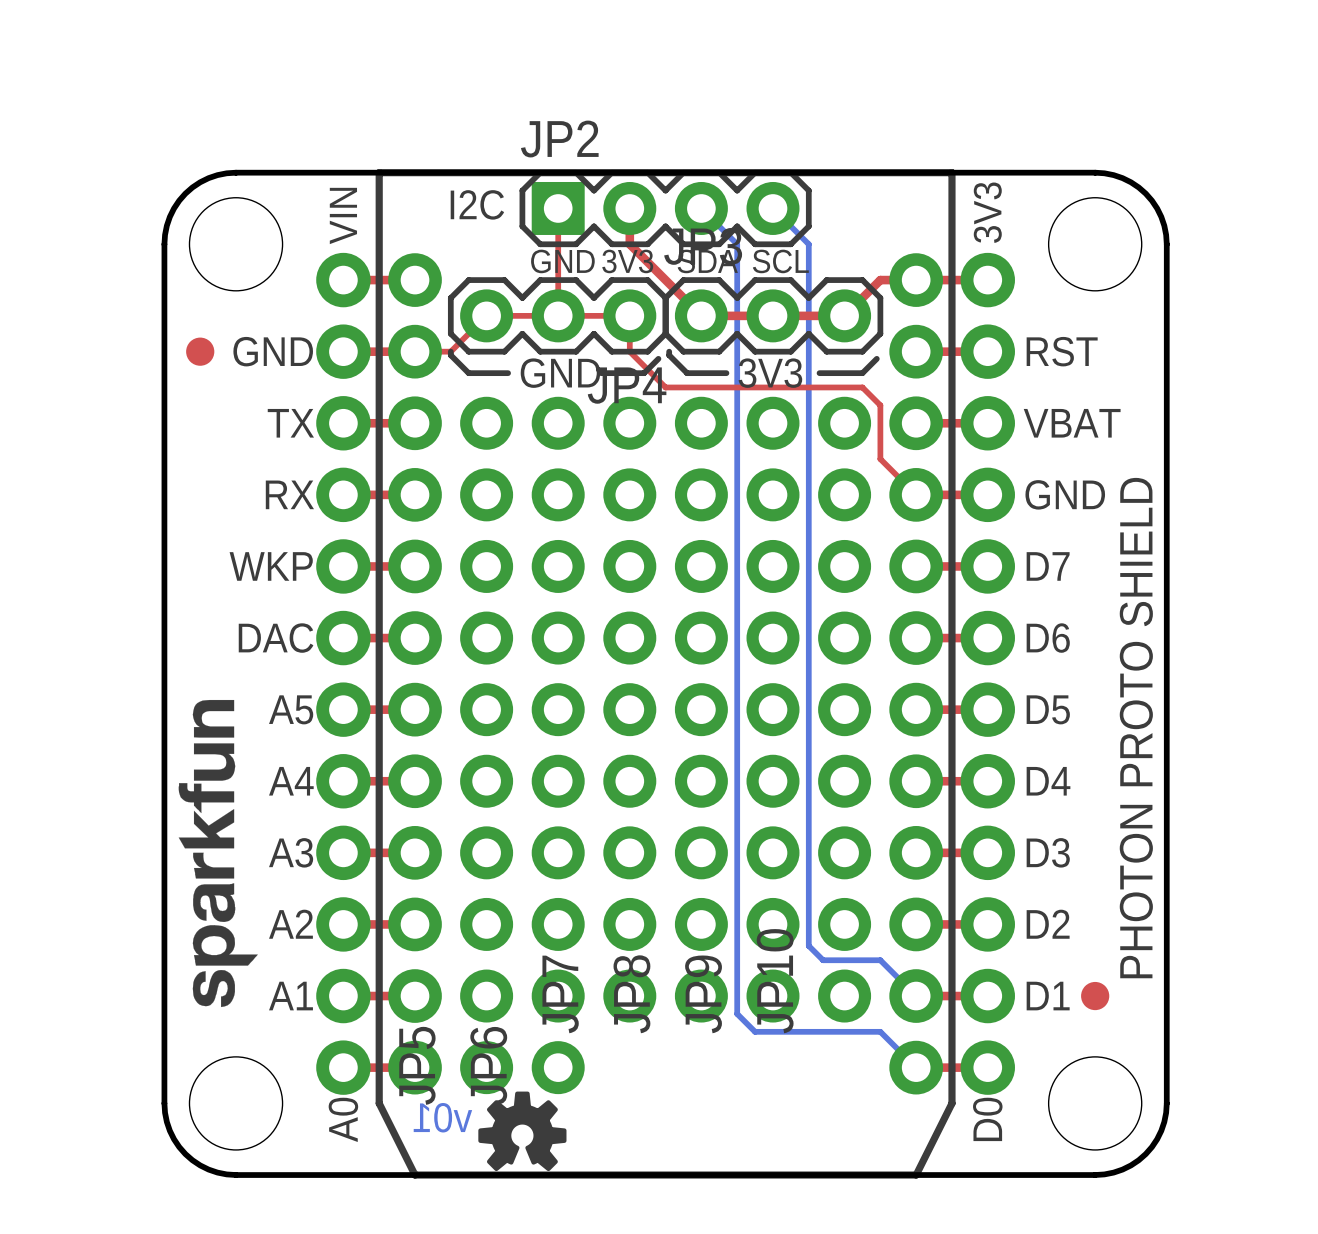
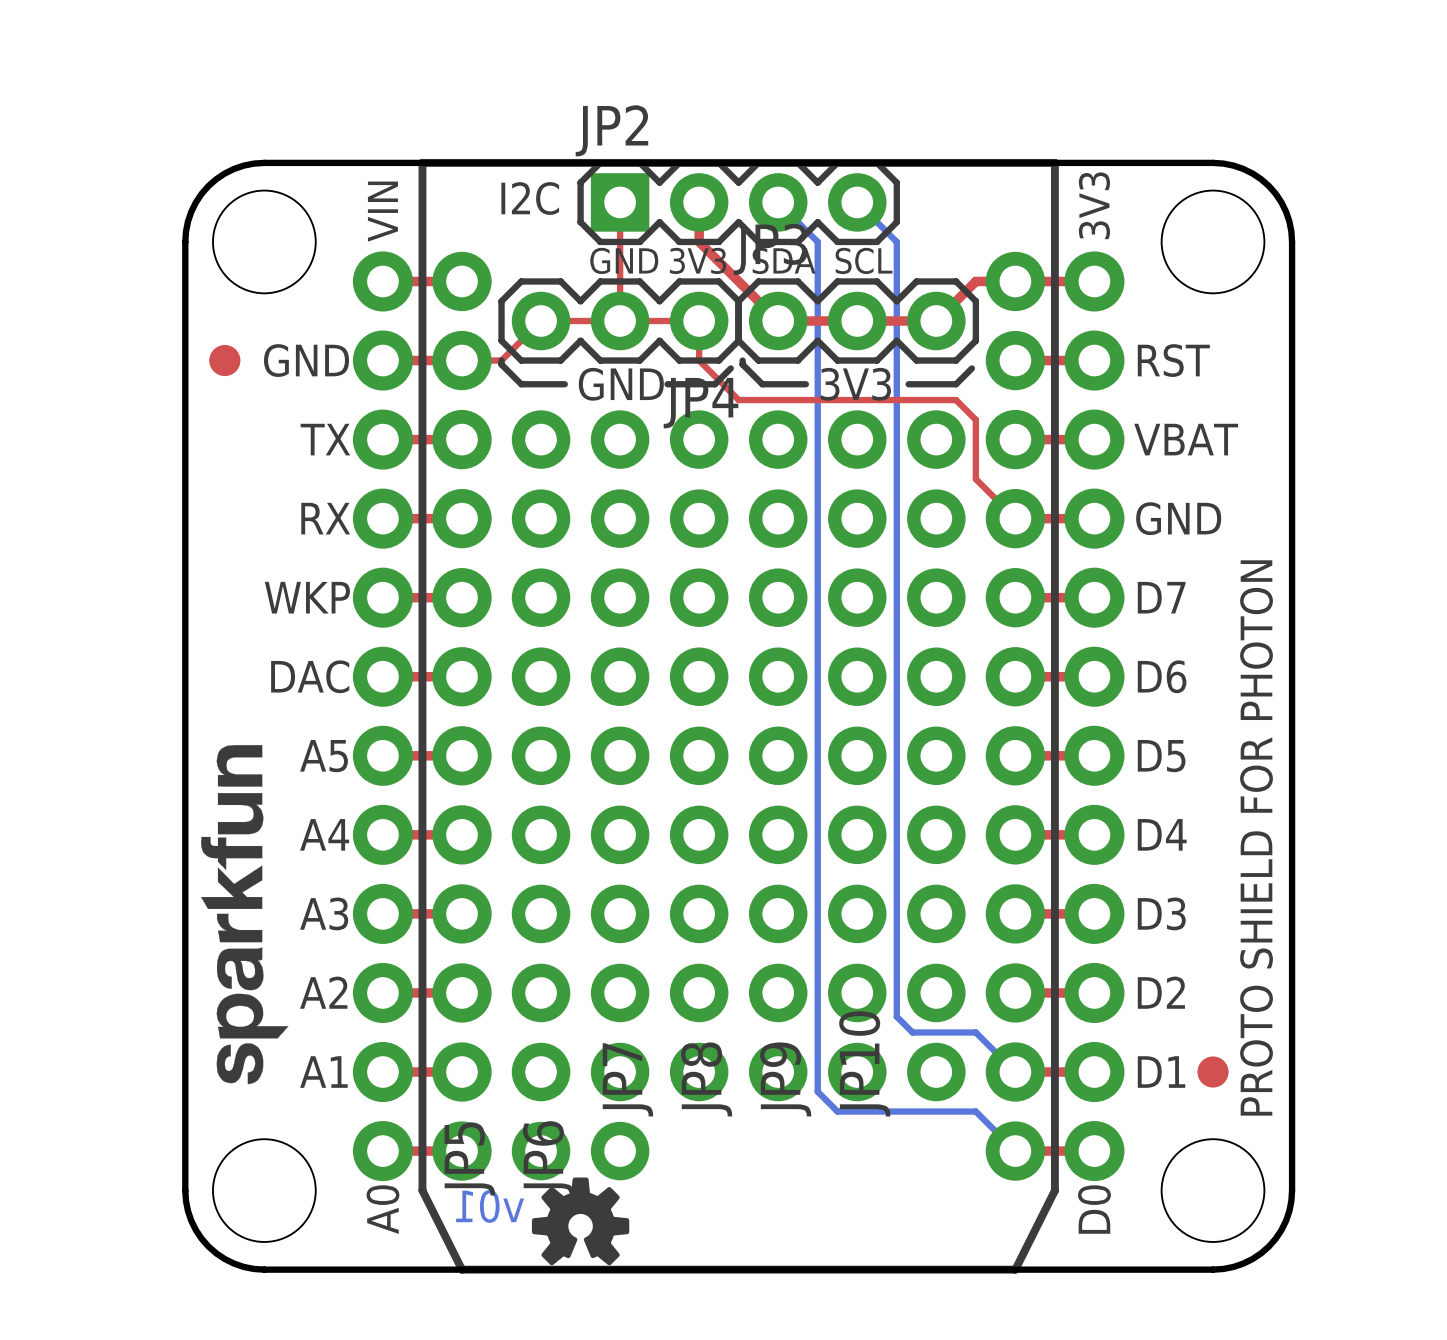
text: PHOTON PROTO SHIELD (1136, 728) -> none
text: none -> PROTO SHIELD FOR PHOTON (1256, 837)

